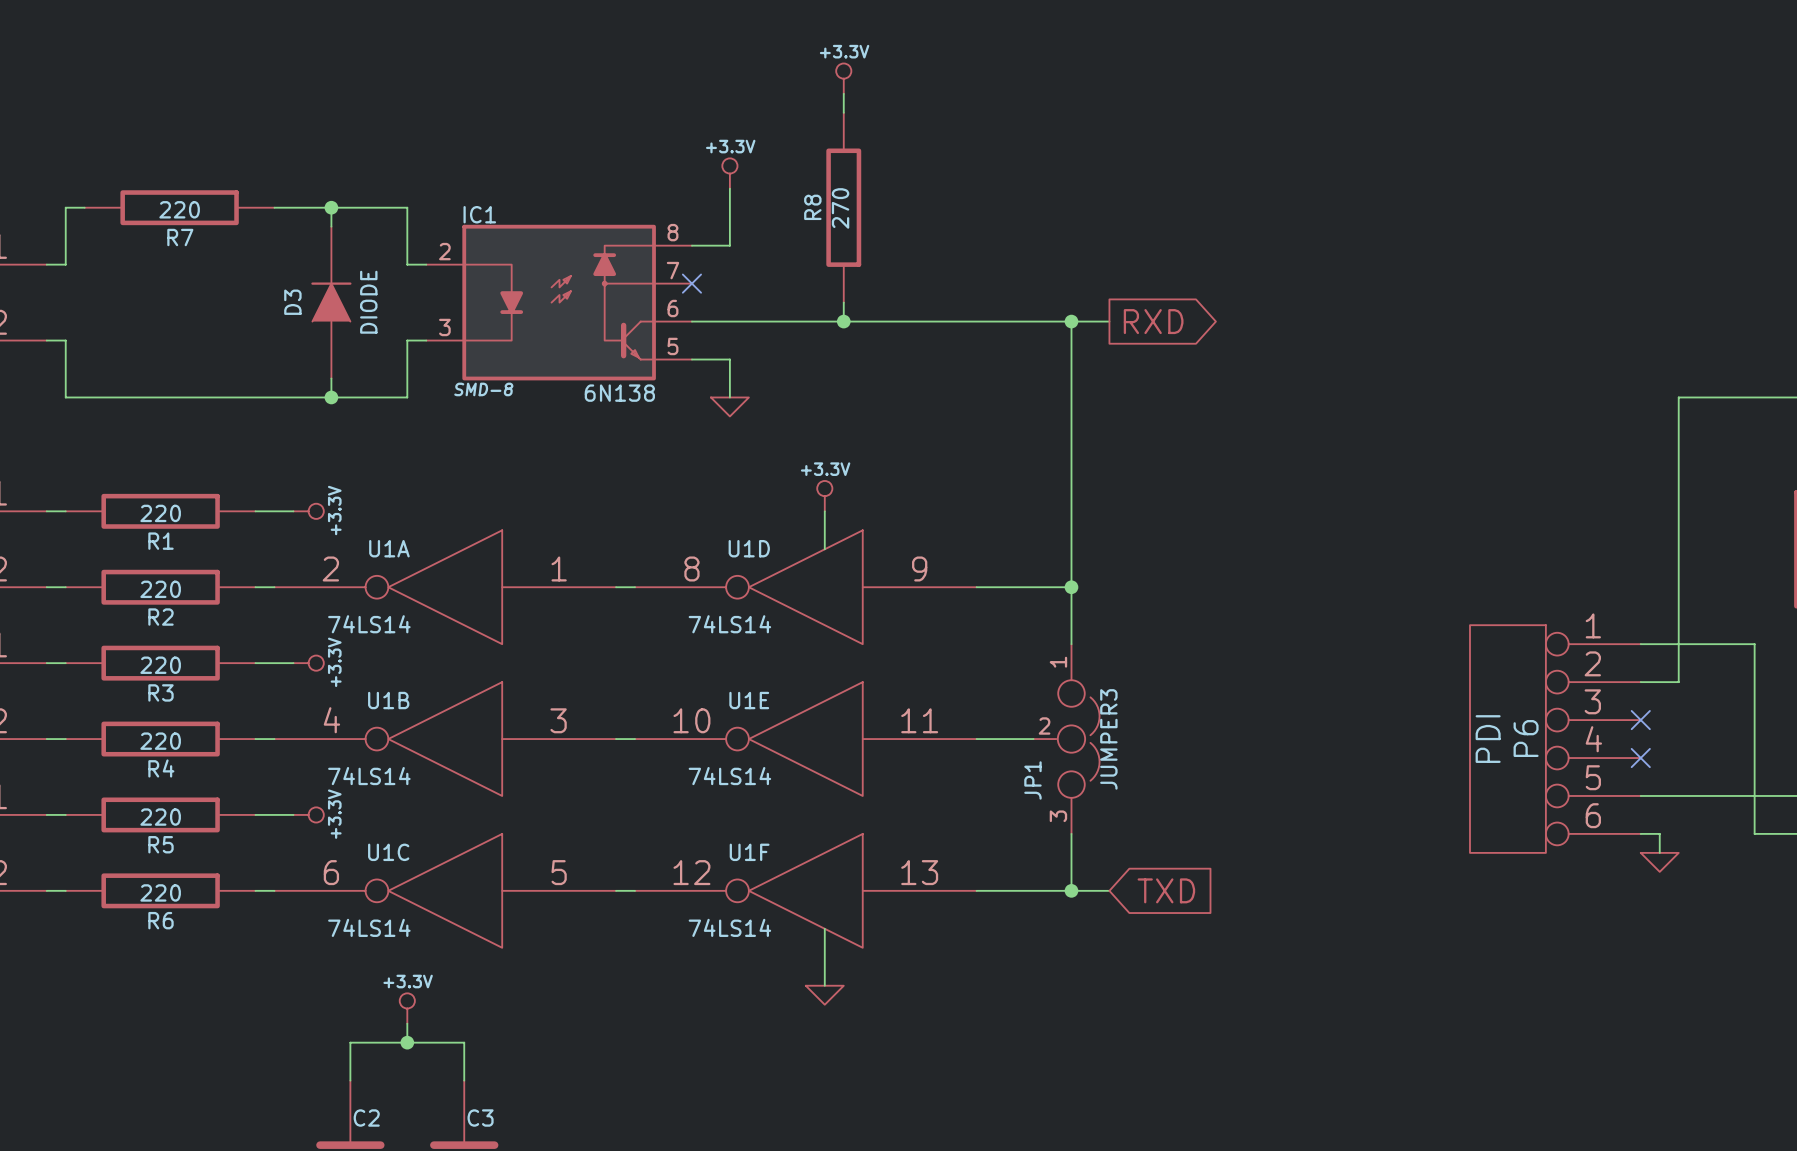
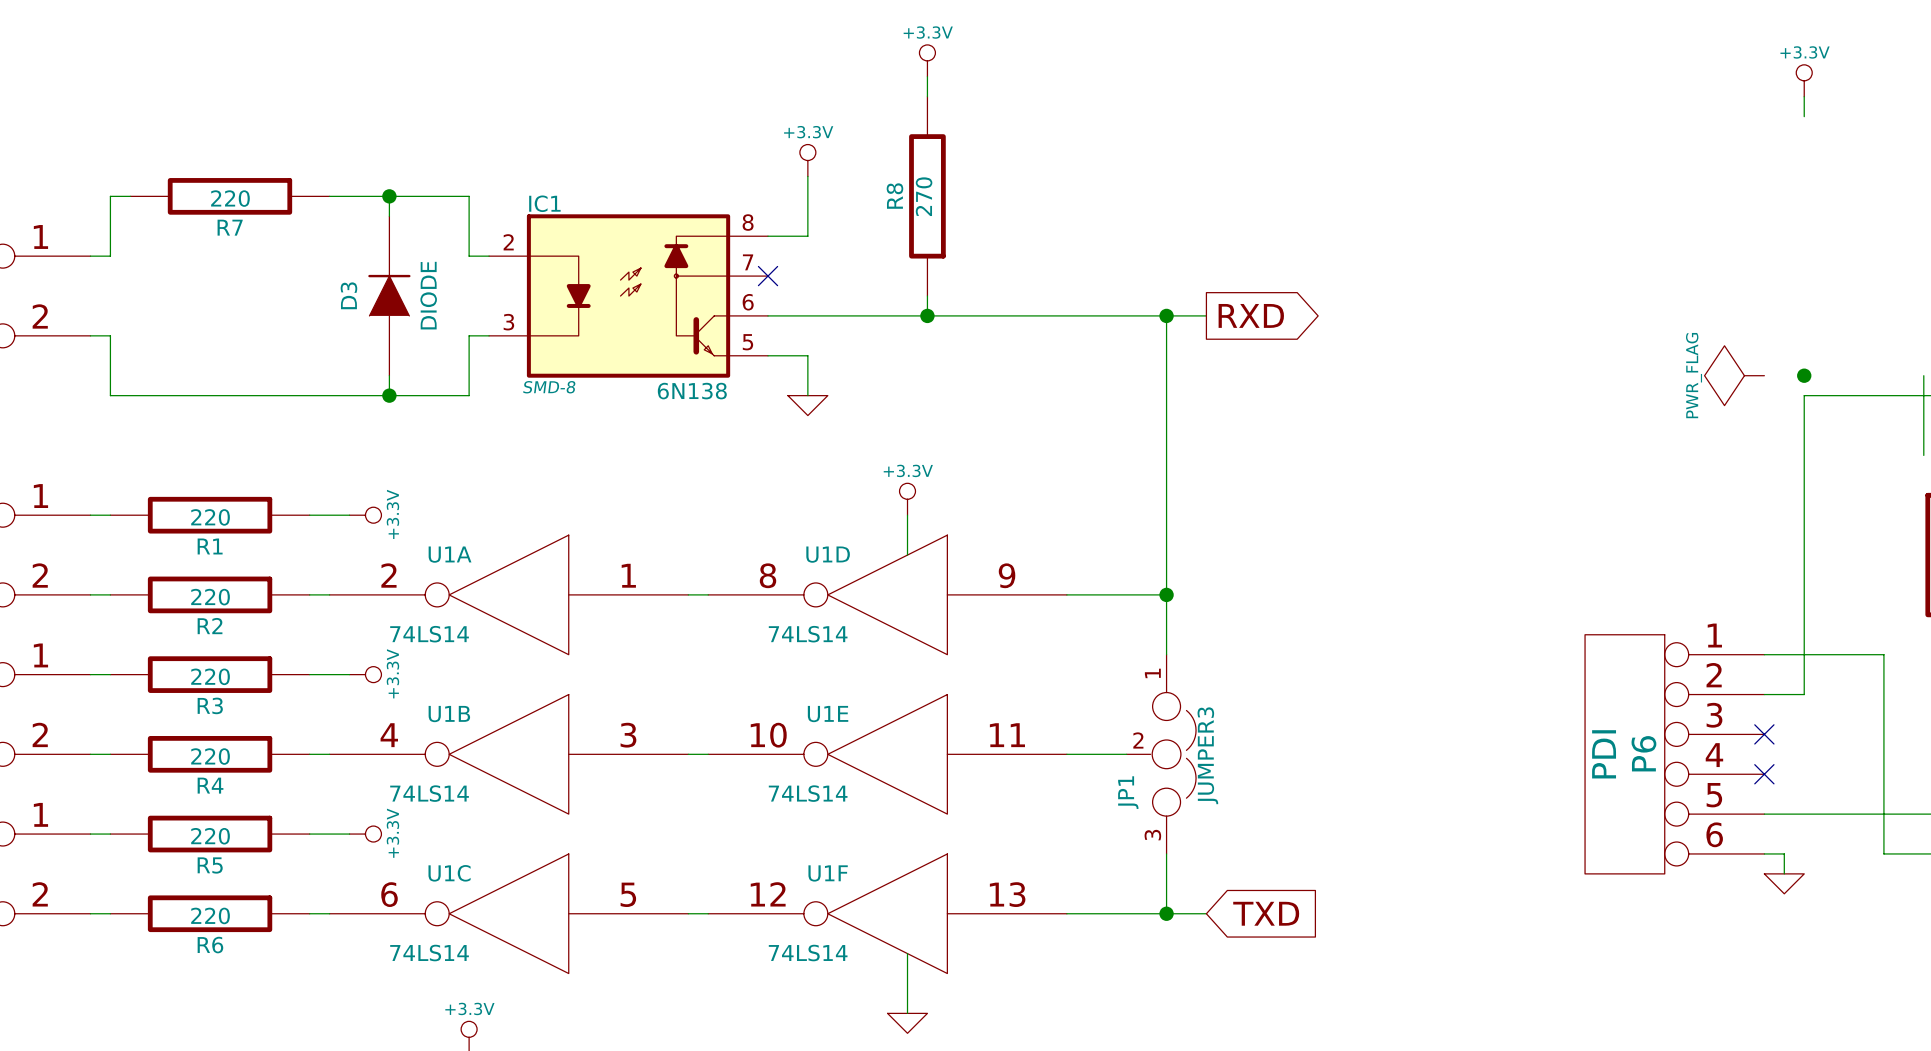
power symbol: none -> +3.3V (1804, 80)
wire: none -> (1804, 96) (1804, 116)
power symbol: none -> PWR_FLAG (1734, 375)
junction: none -> (1804, 375)
wire: none -> (1923, 375) (1923, 455)

